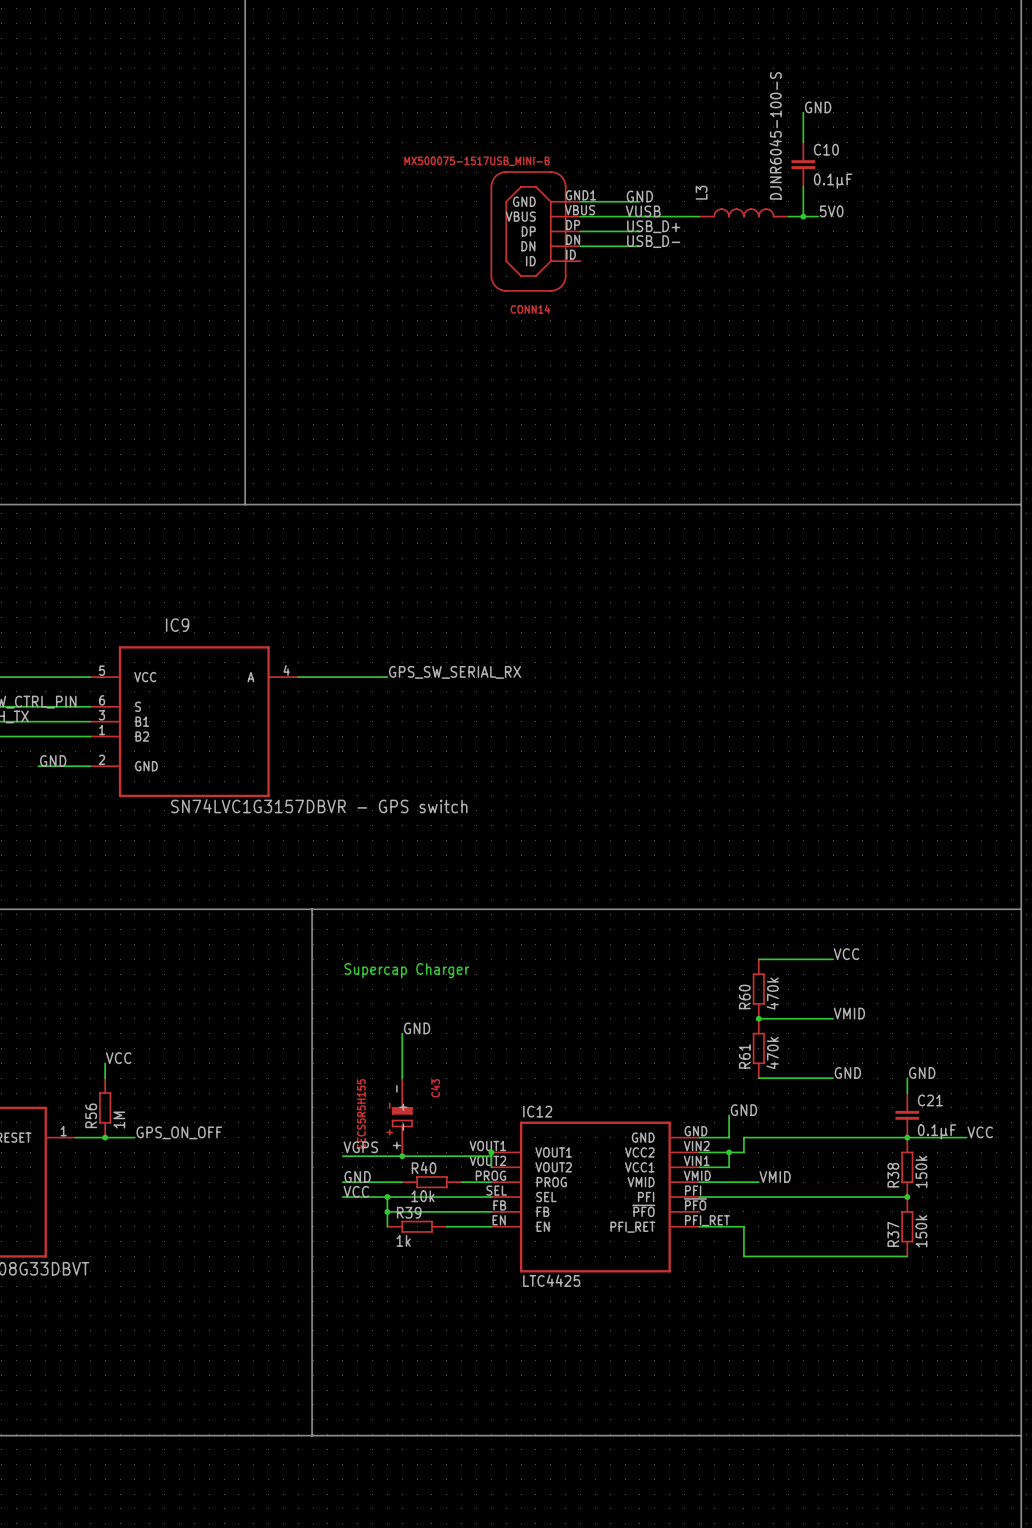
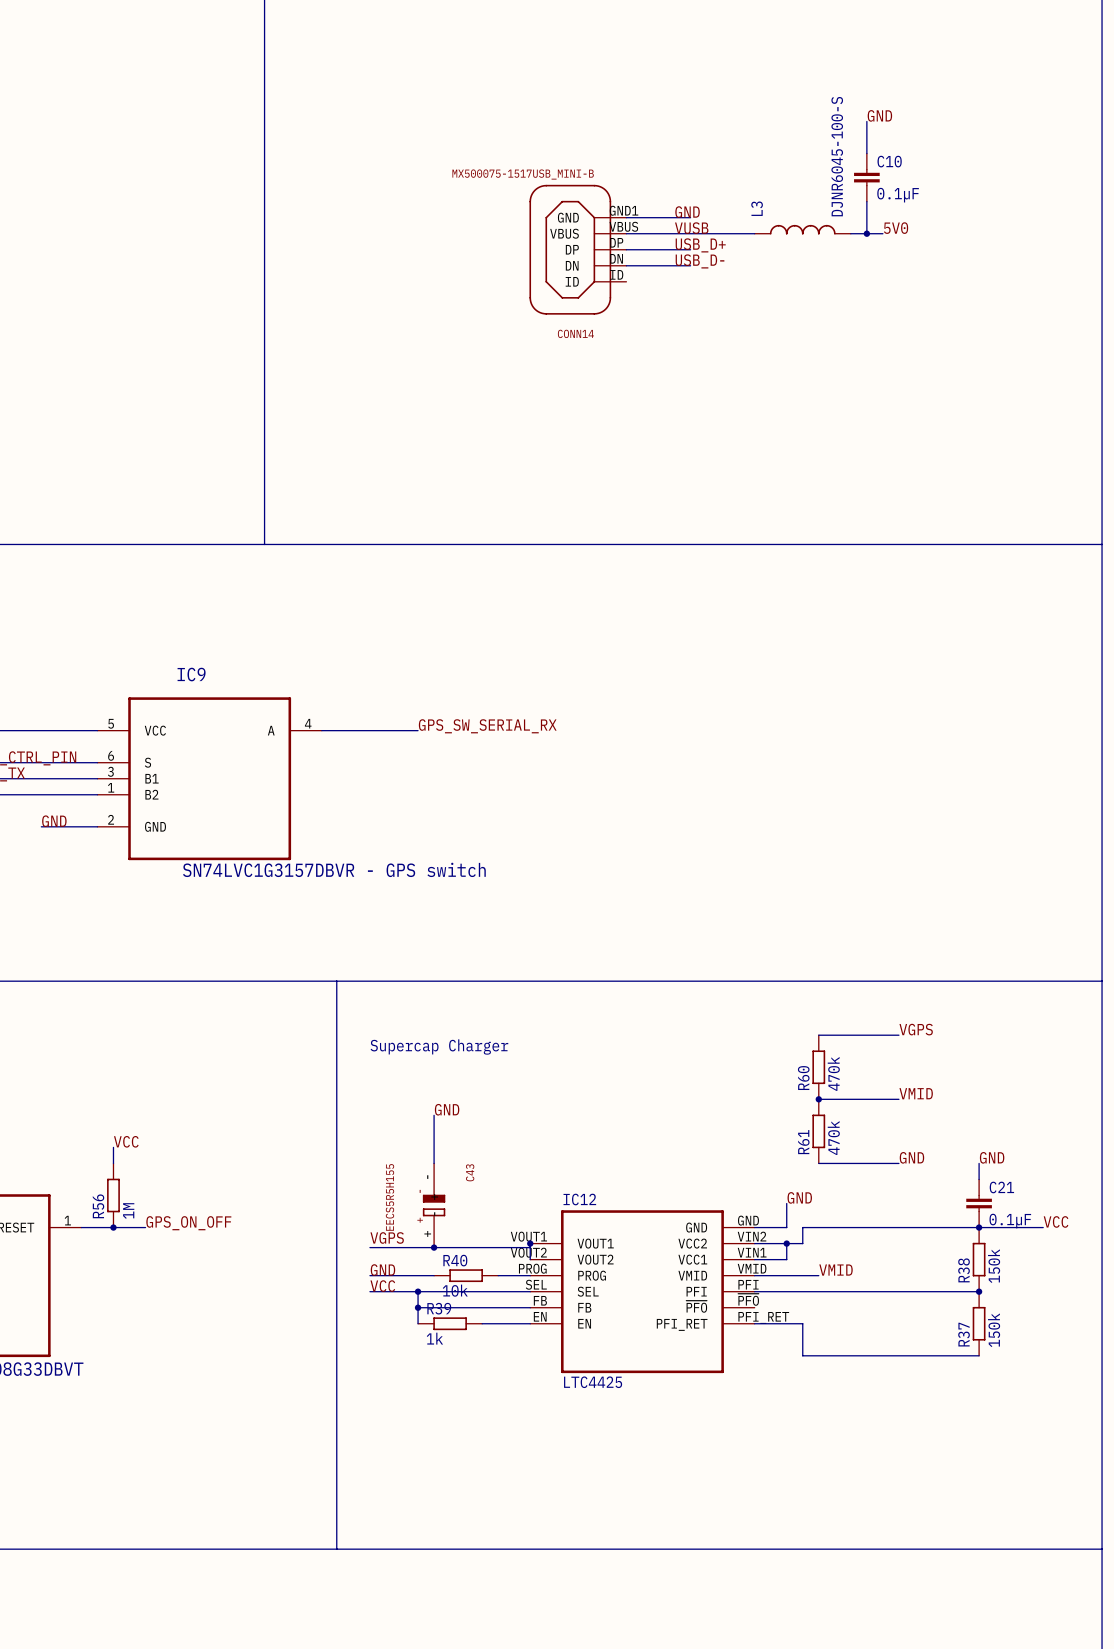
label: VCC (846, 954) -> VGPS (916, 1029)

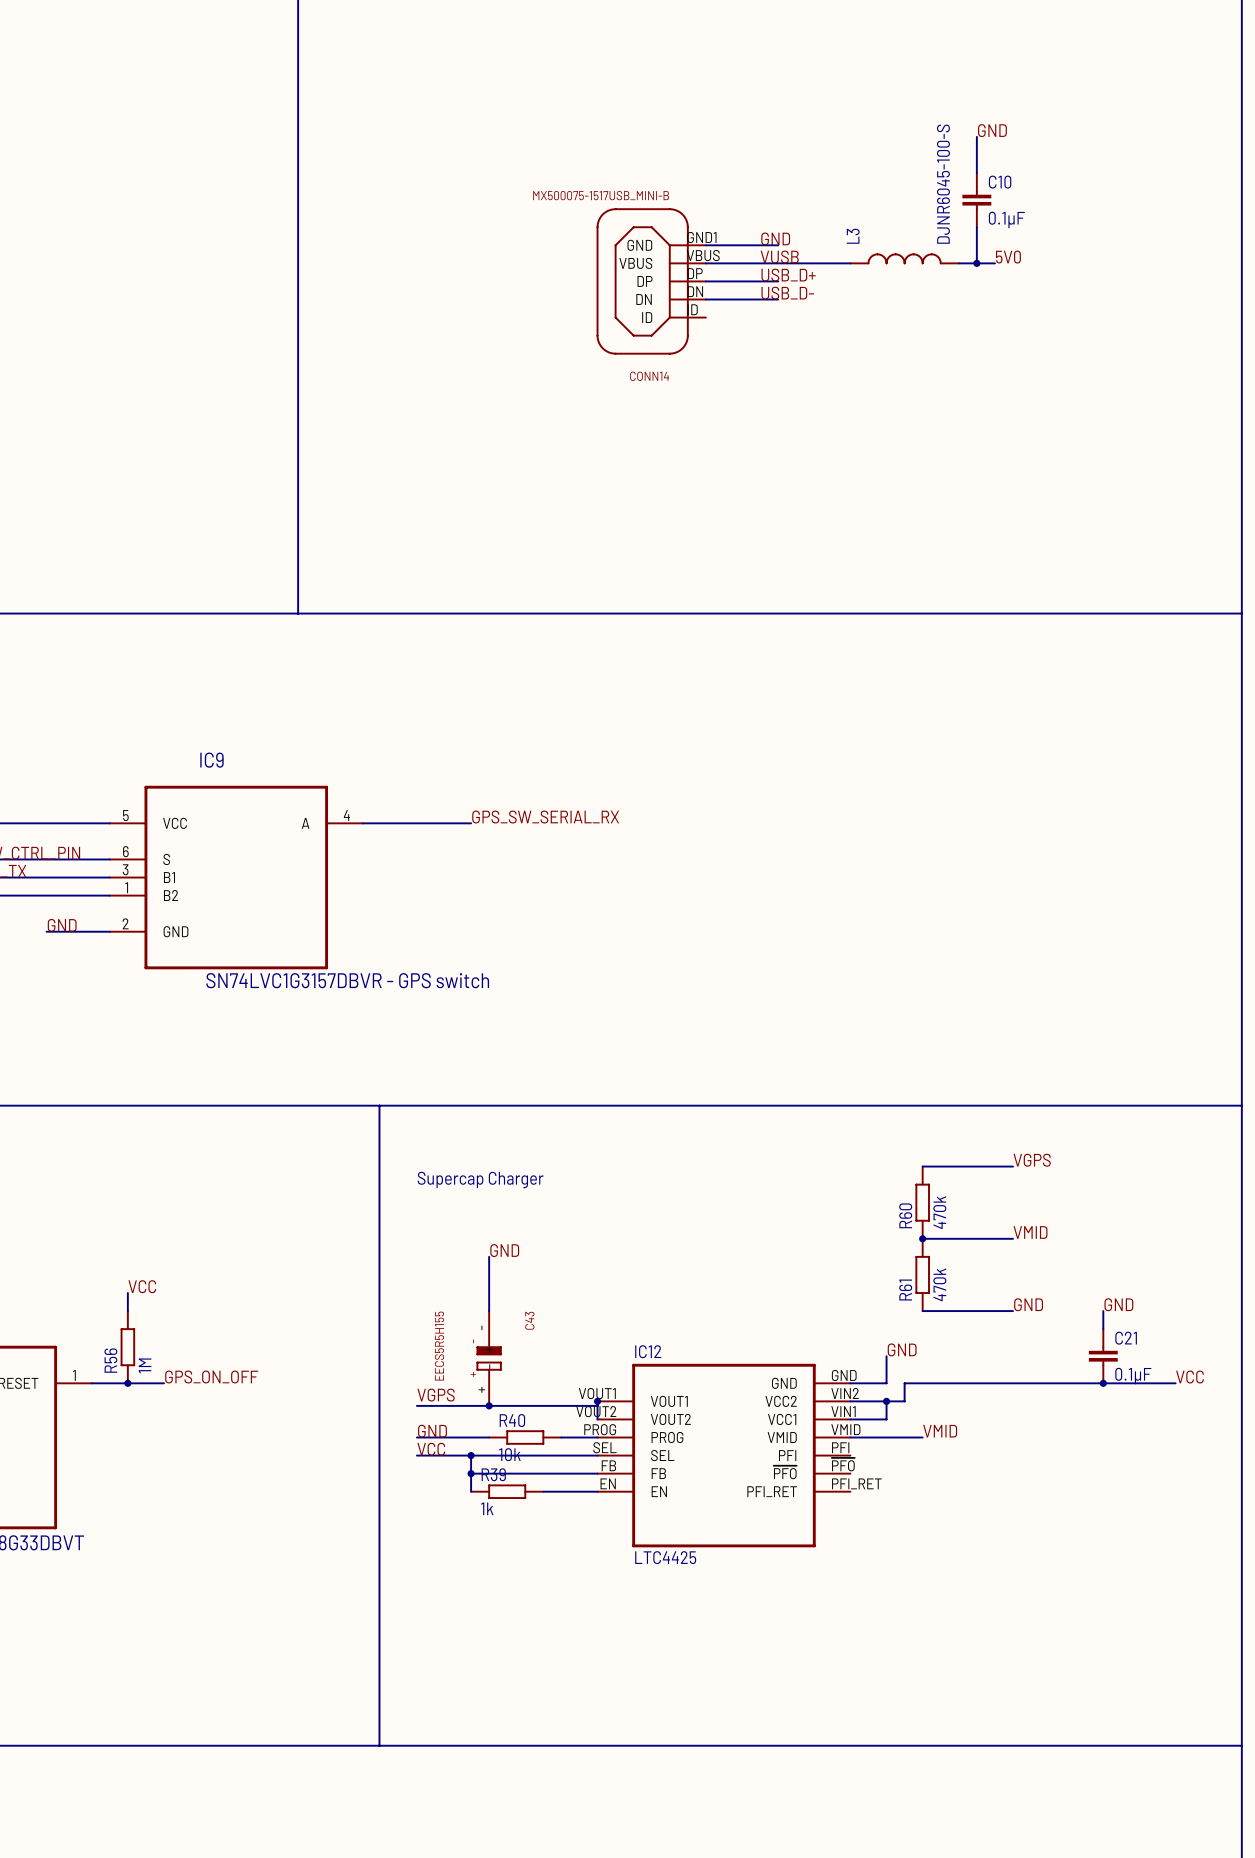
R38: 150k (979, 1259) -> none
wire: (754, 1291) (979, 1291) -> none
junction: (979, 1291) -> none
wire: (754, 1323) (802, 1323) (802, 1355) (979, 1355) -> none
R37: 150k (979, 1323) -> none

